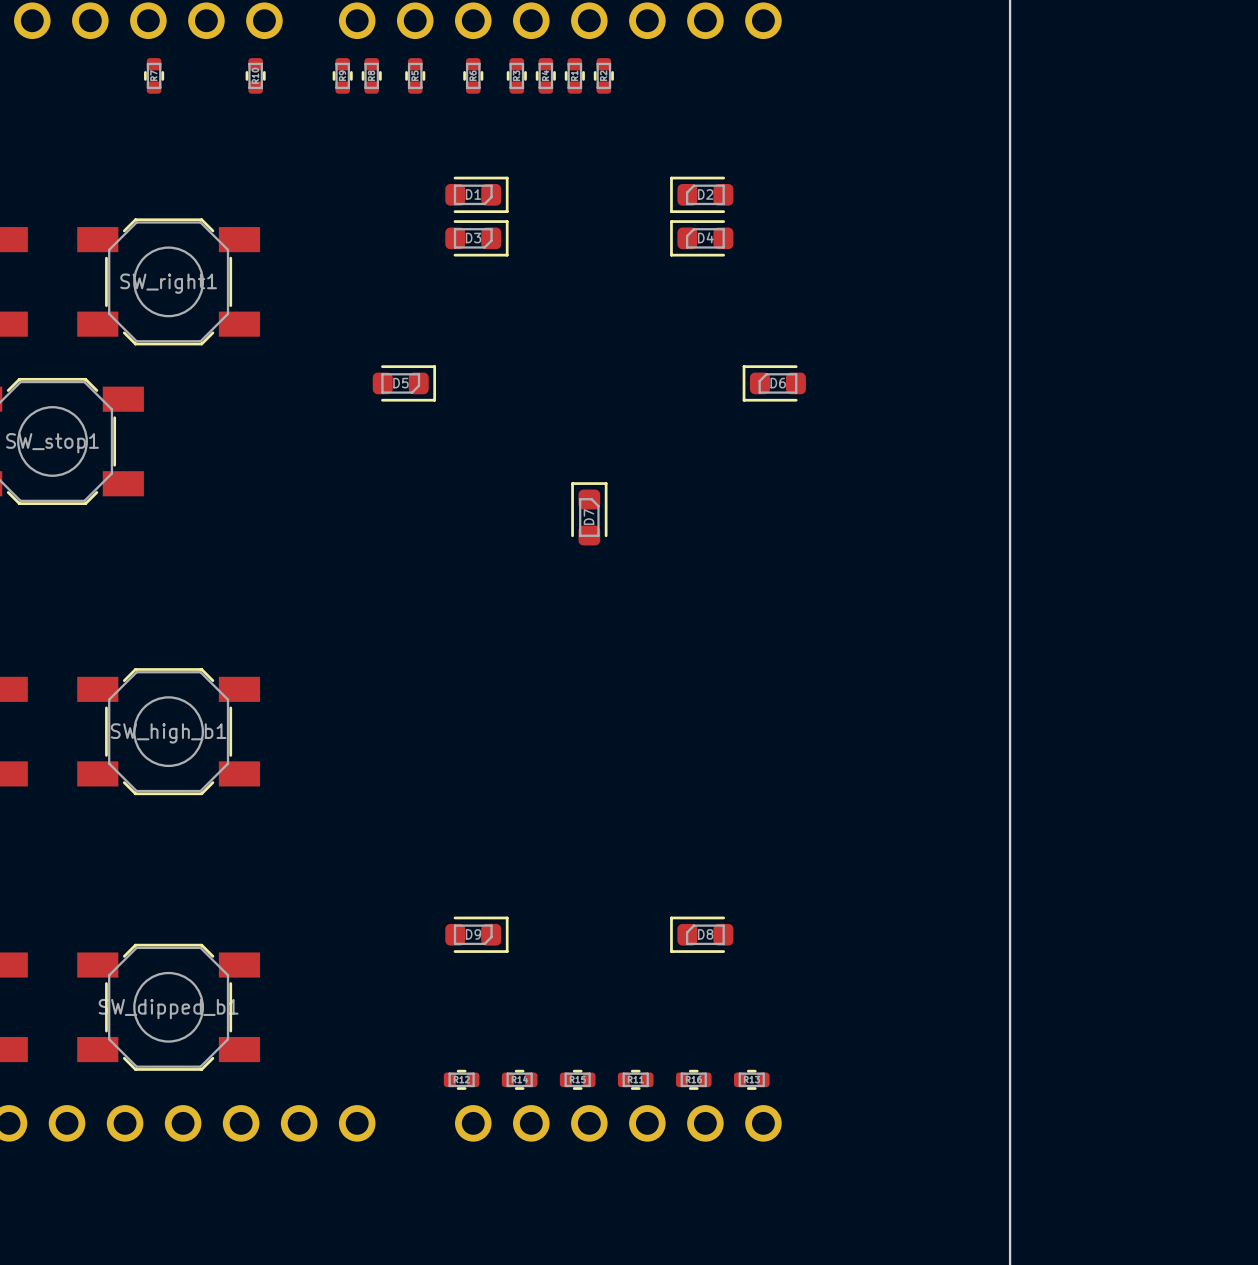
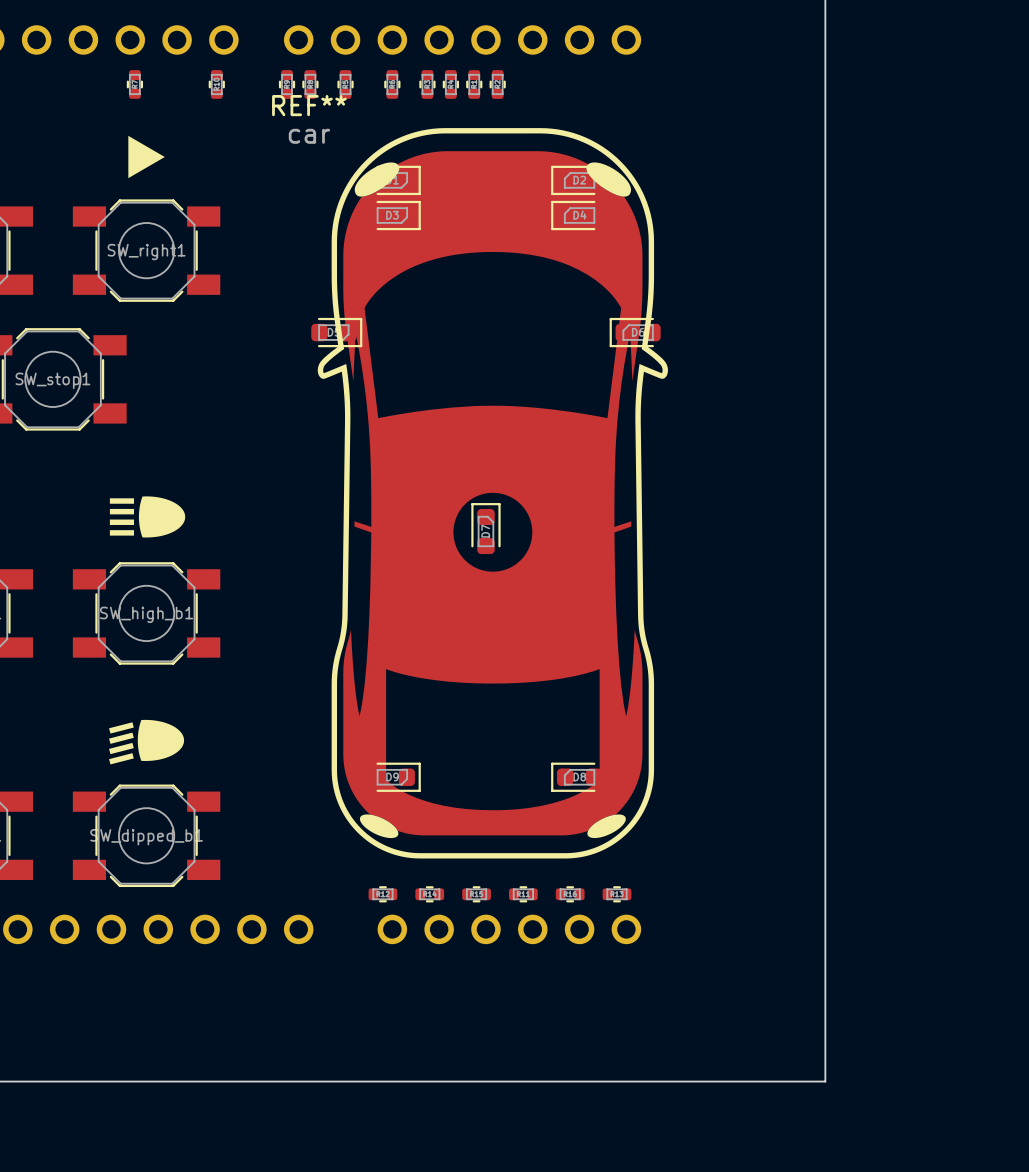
drawing: none -> [128, 135, 165, 179]
D7 position: (589, 513) -> (485, 528)
REF**: none -> car (492, 493)
drawing: none -> [109, 496, 186, 538]
drawing: none -> [109, 719, 185, 765]

